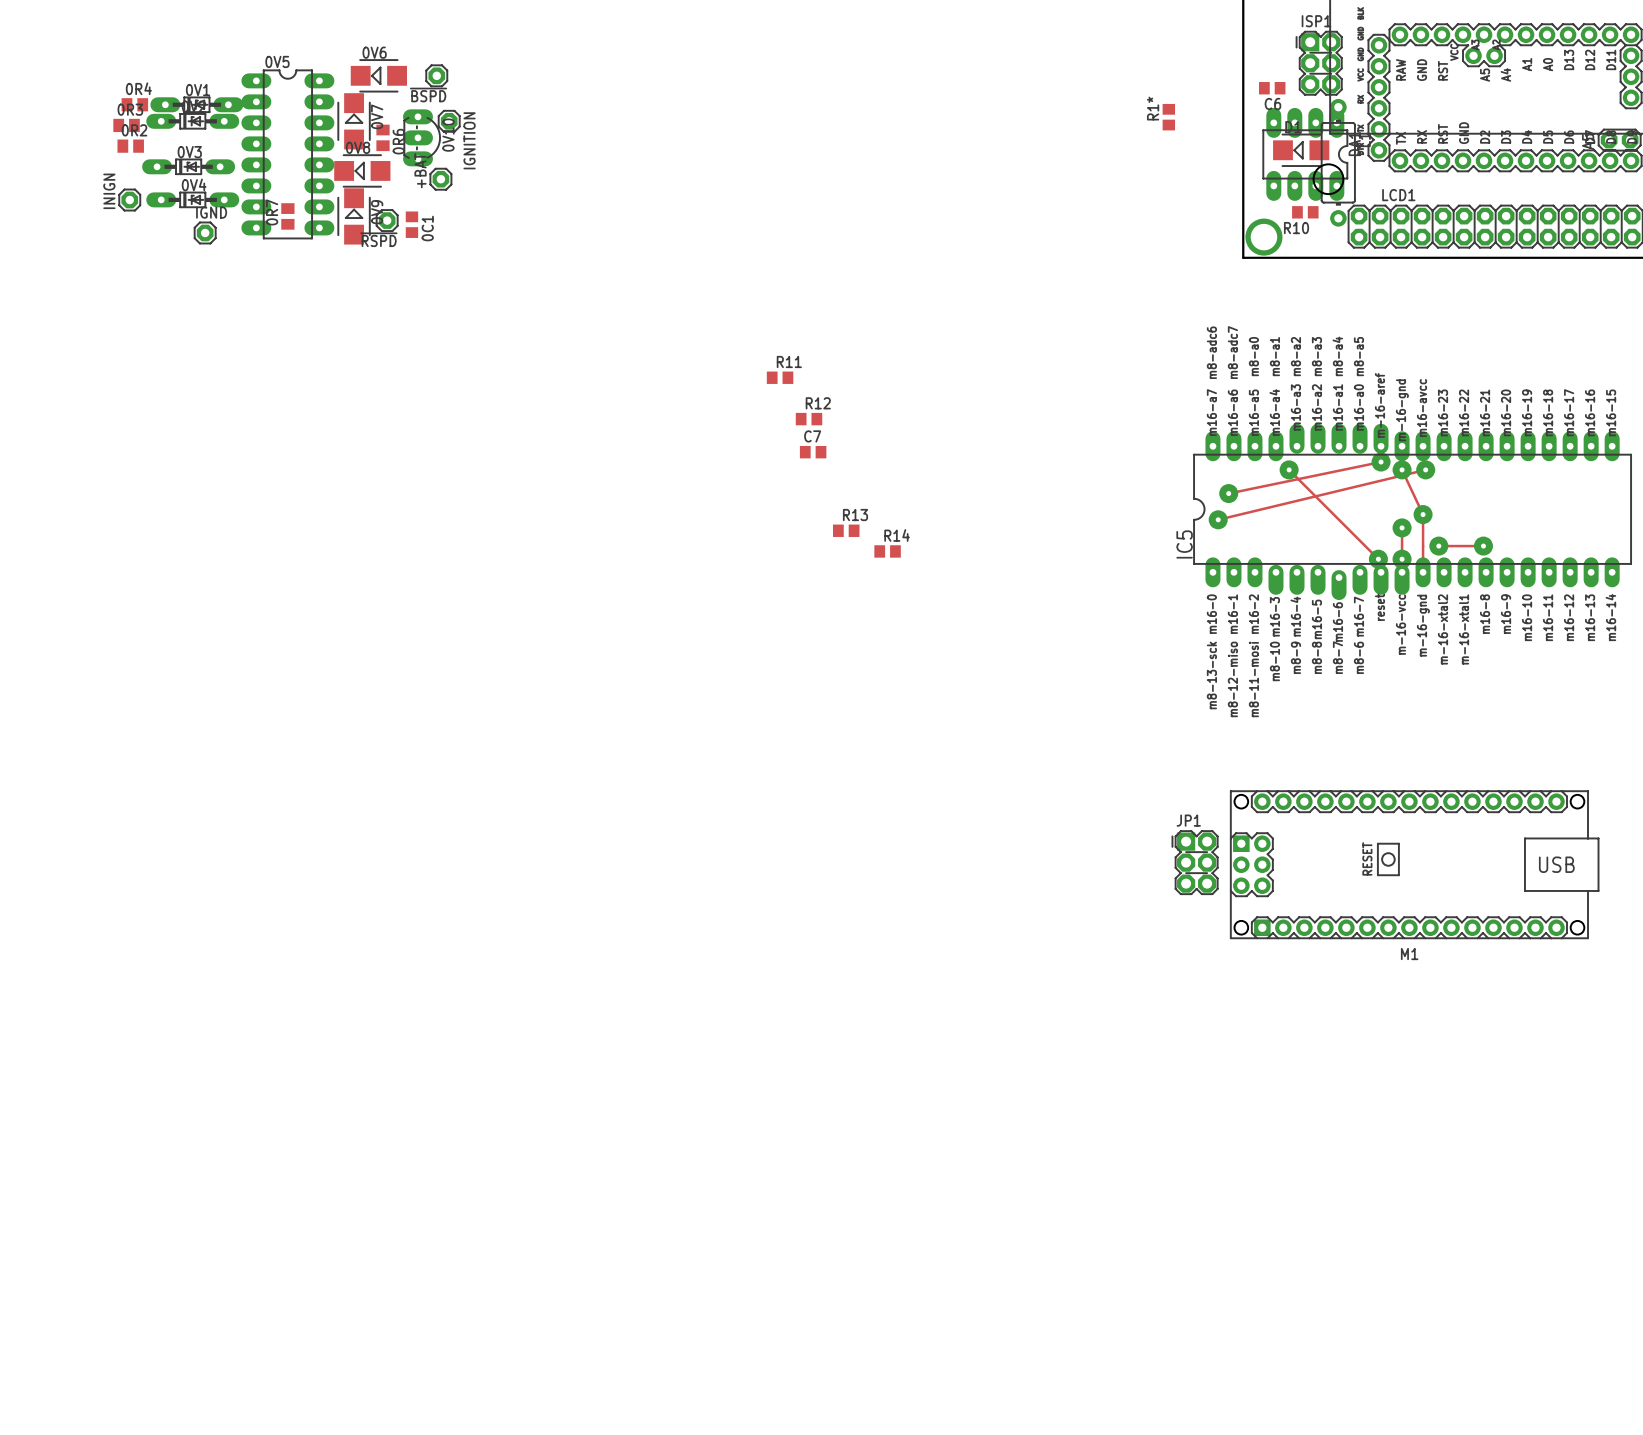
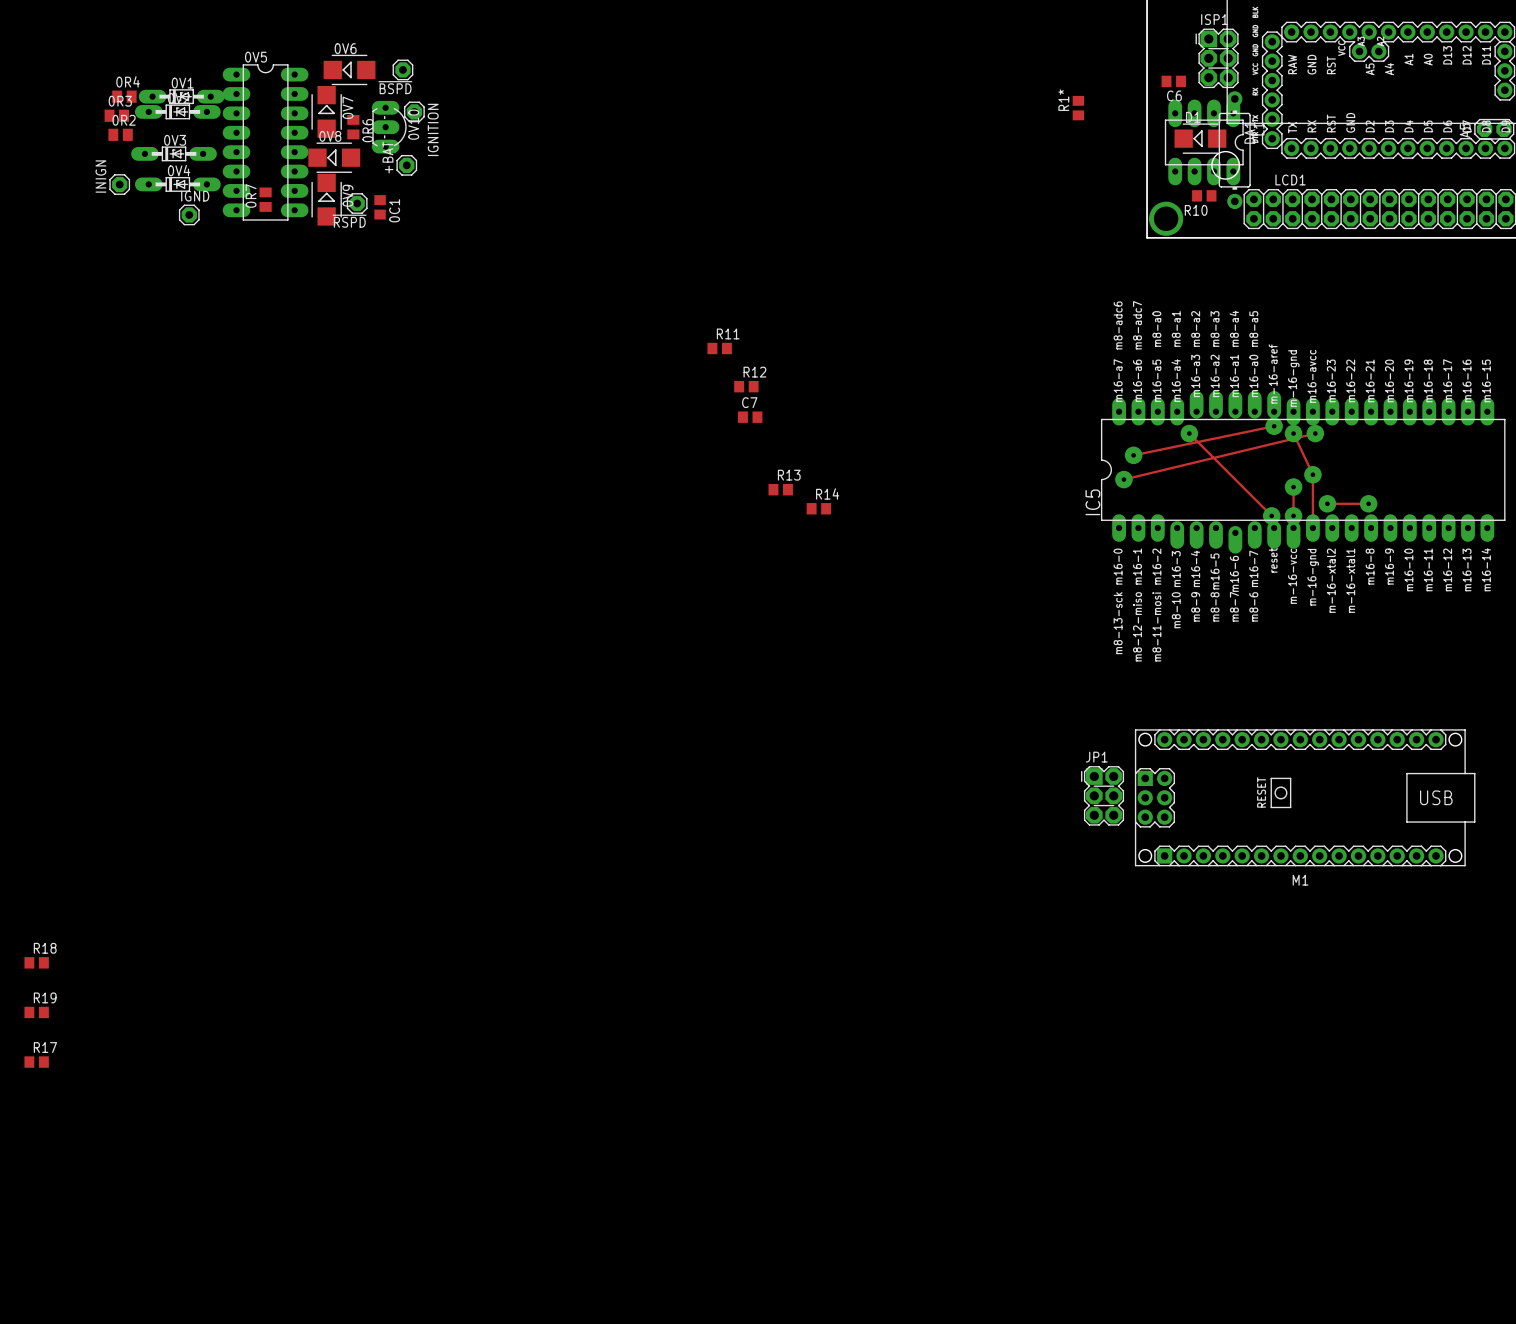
R18: none -> (36, 962)
R19: none -> (36, 1012)
R17: none -> (36, 1062)

